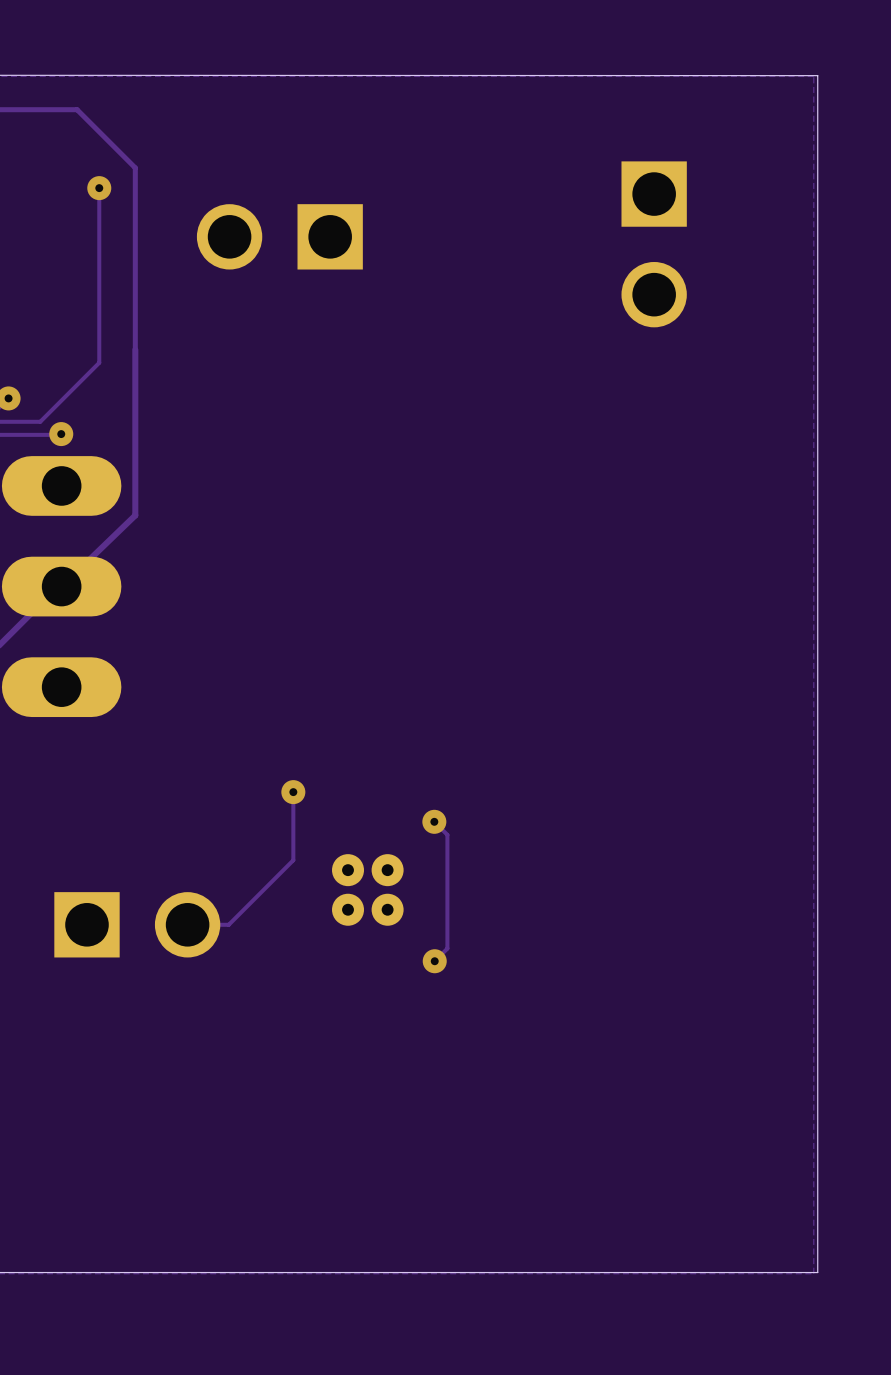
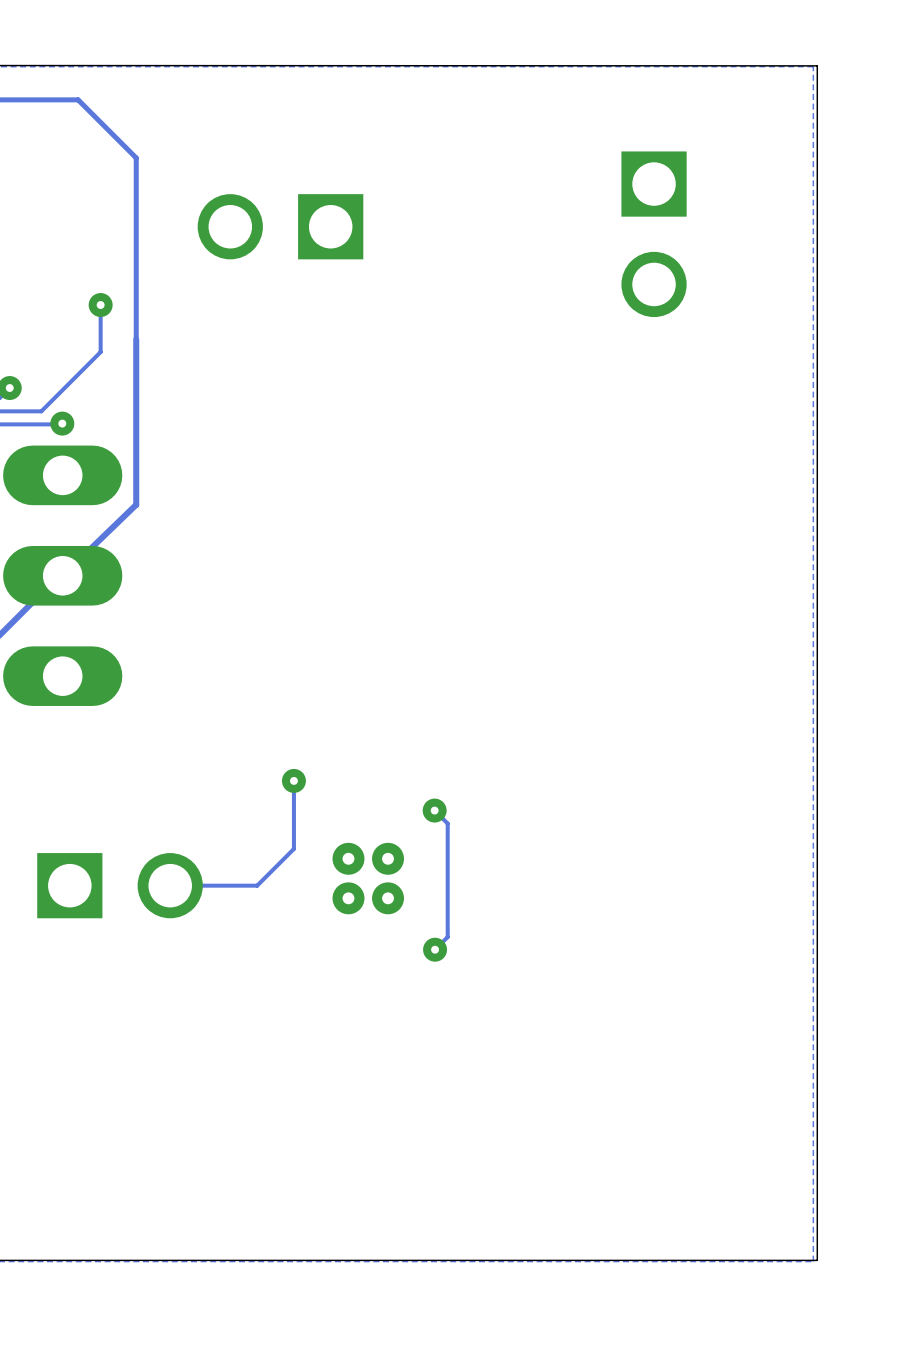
track: (99, 188) (99, 362) -> (100, 305) (100, 352)
via position: (99, 188) -> (100, 305)
track: (256, 897) (228, 924) (187, 924) -> (257, 885) (170, 885)
part position: (137, 924) -> (120, 885)

